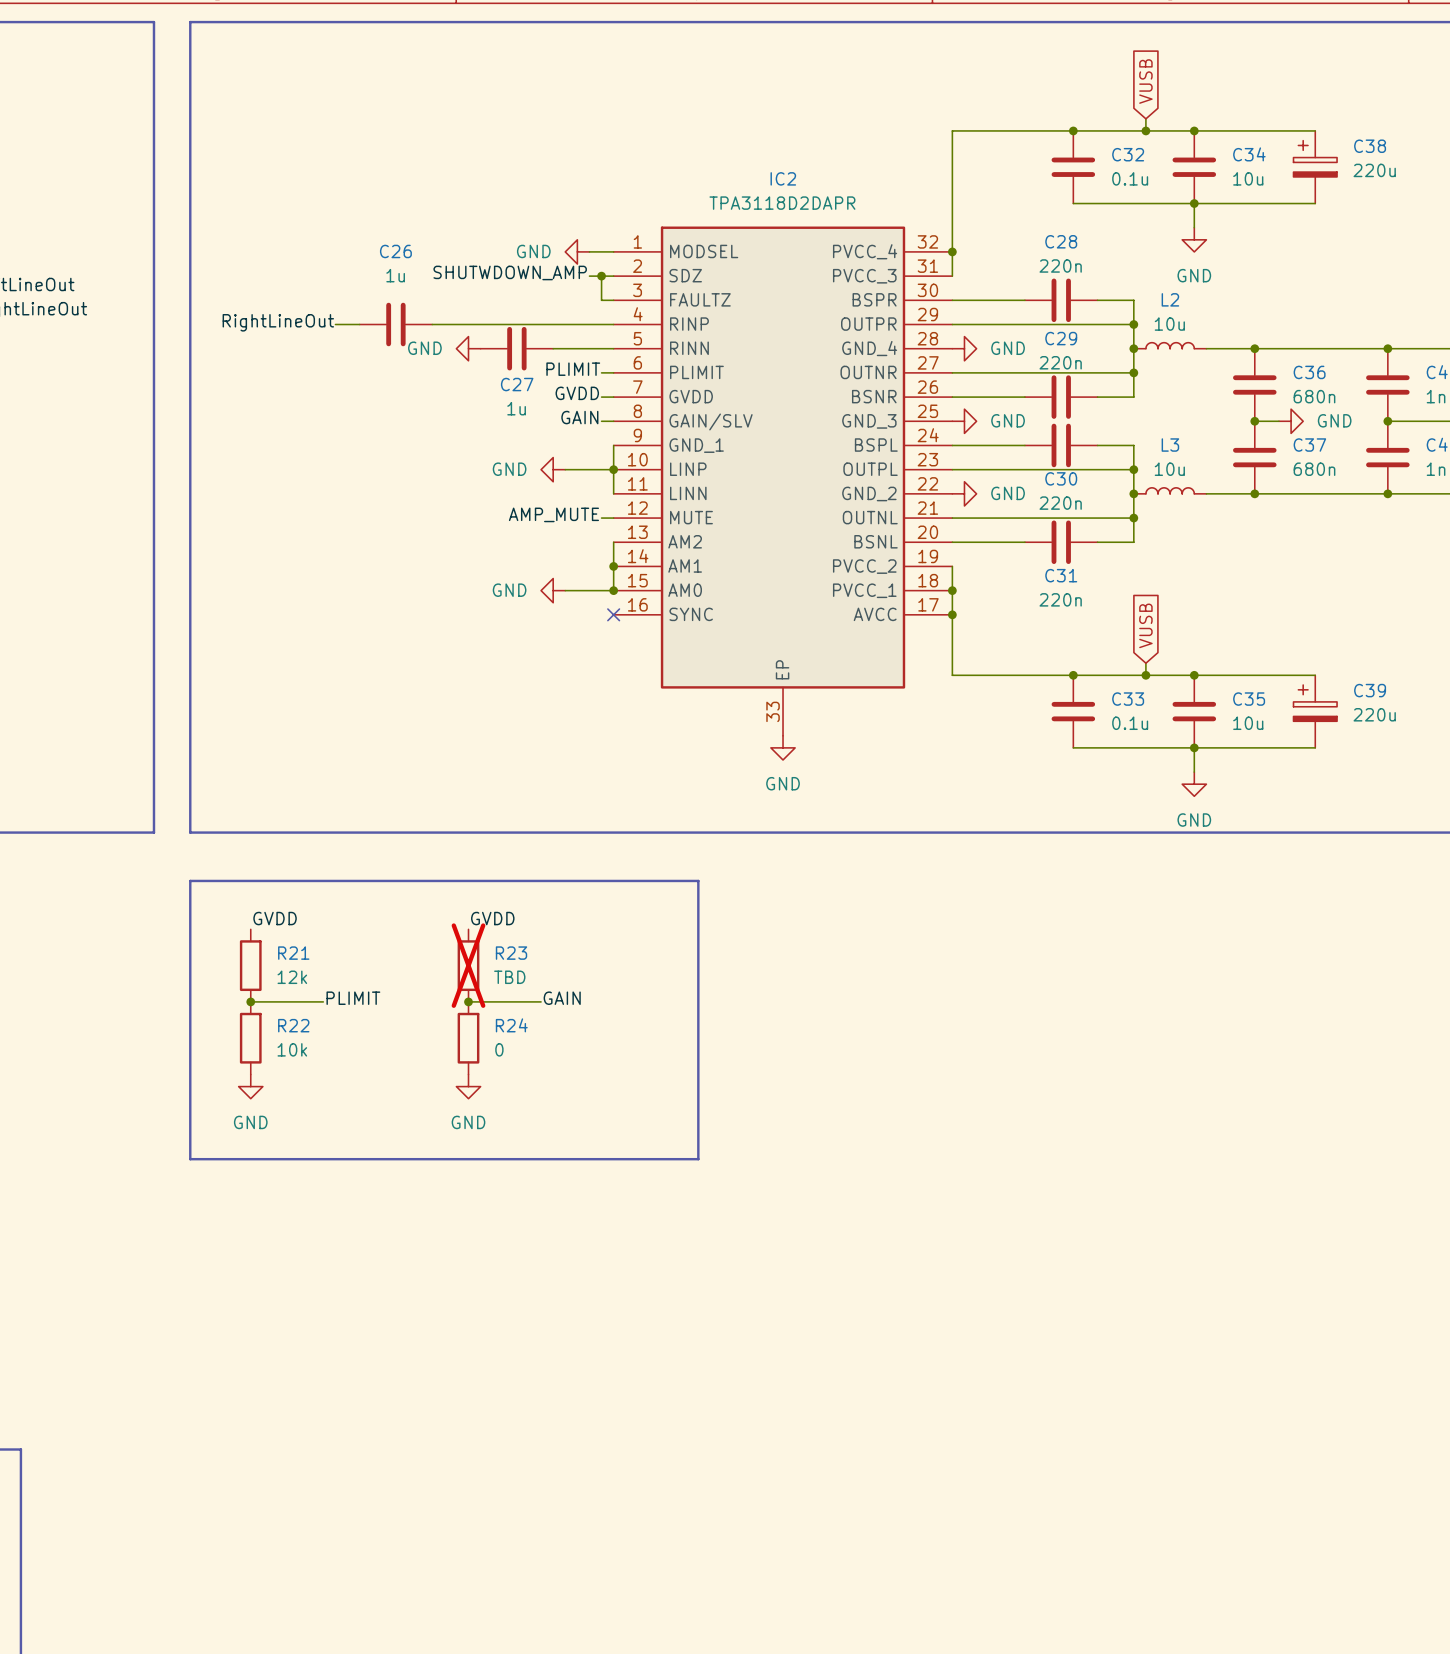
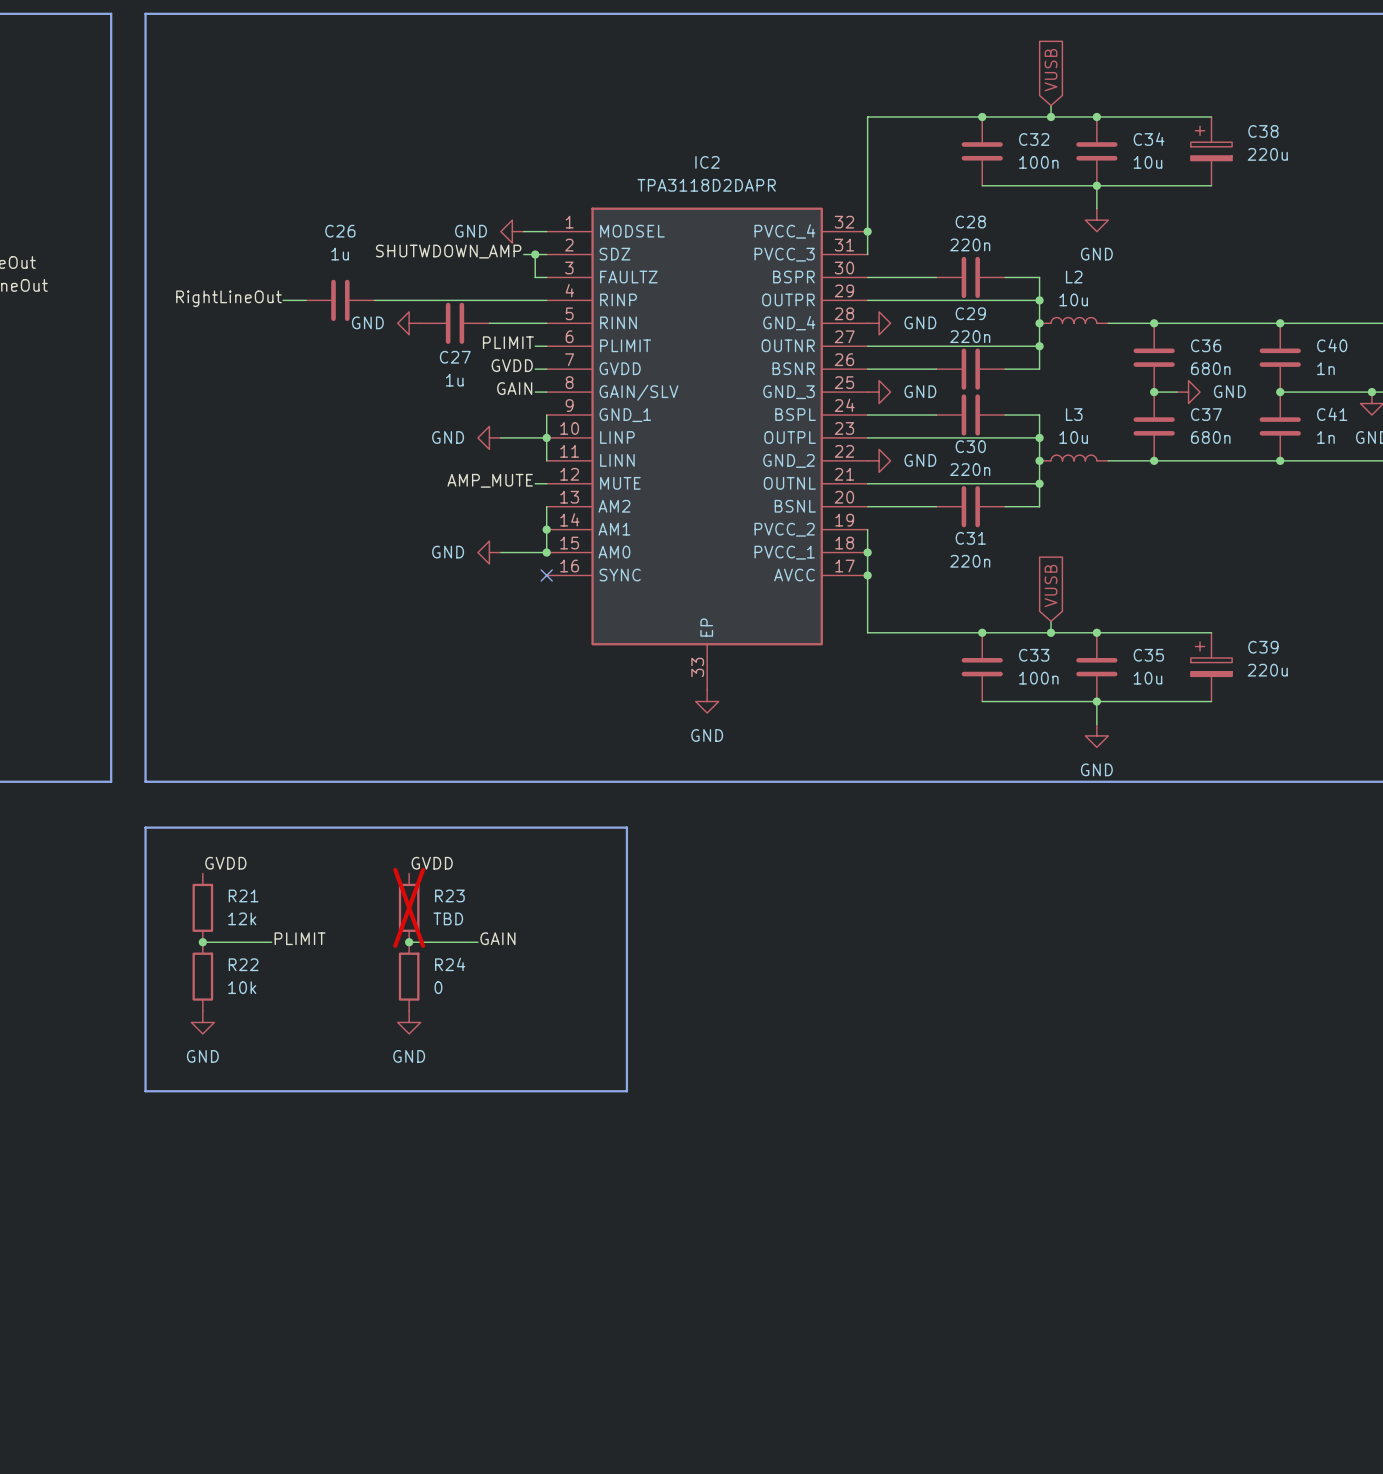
C32 value: 0.1u (1130, 178) -> 100n (1038, 162)
C33 value: 0.1u (1130, 723) -> 100n (1038, 678)

